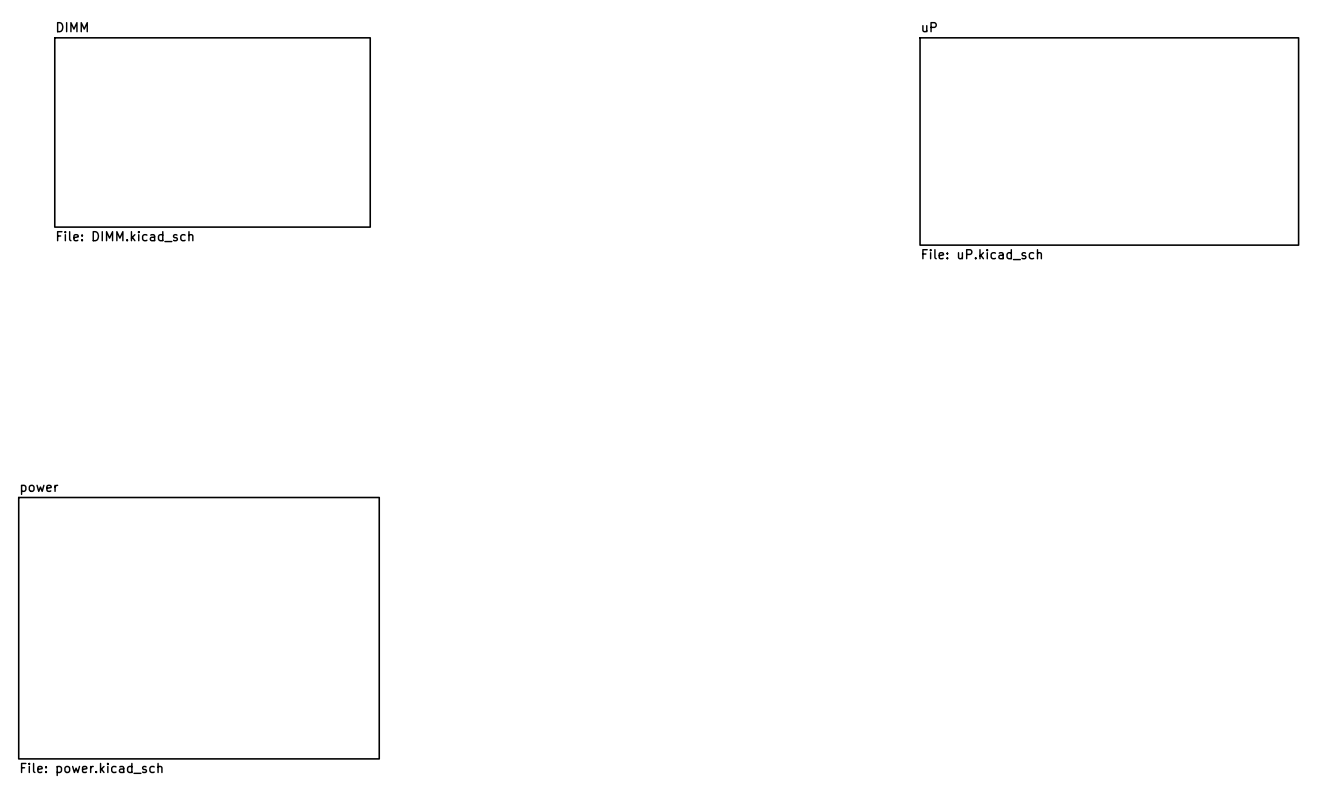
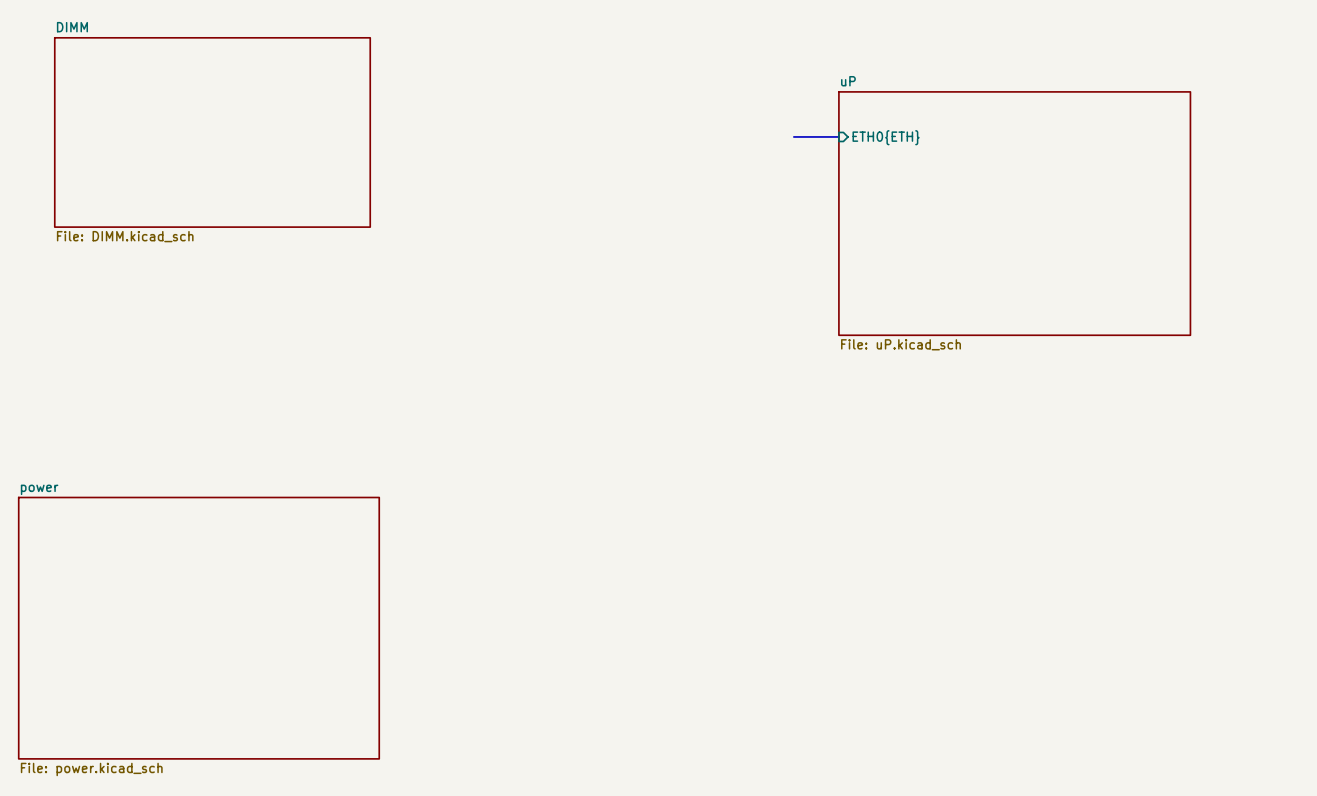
bus: none -> (793, 136) (838, 136)
sheet pin: none -> ETH0{ETH} (886, 137)
sheet uP: File: uP.kicad_sch (1109, 141) -> none
sheet uP: none -> File: uP.kicad_sch (1014, 213)

